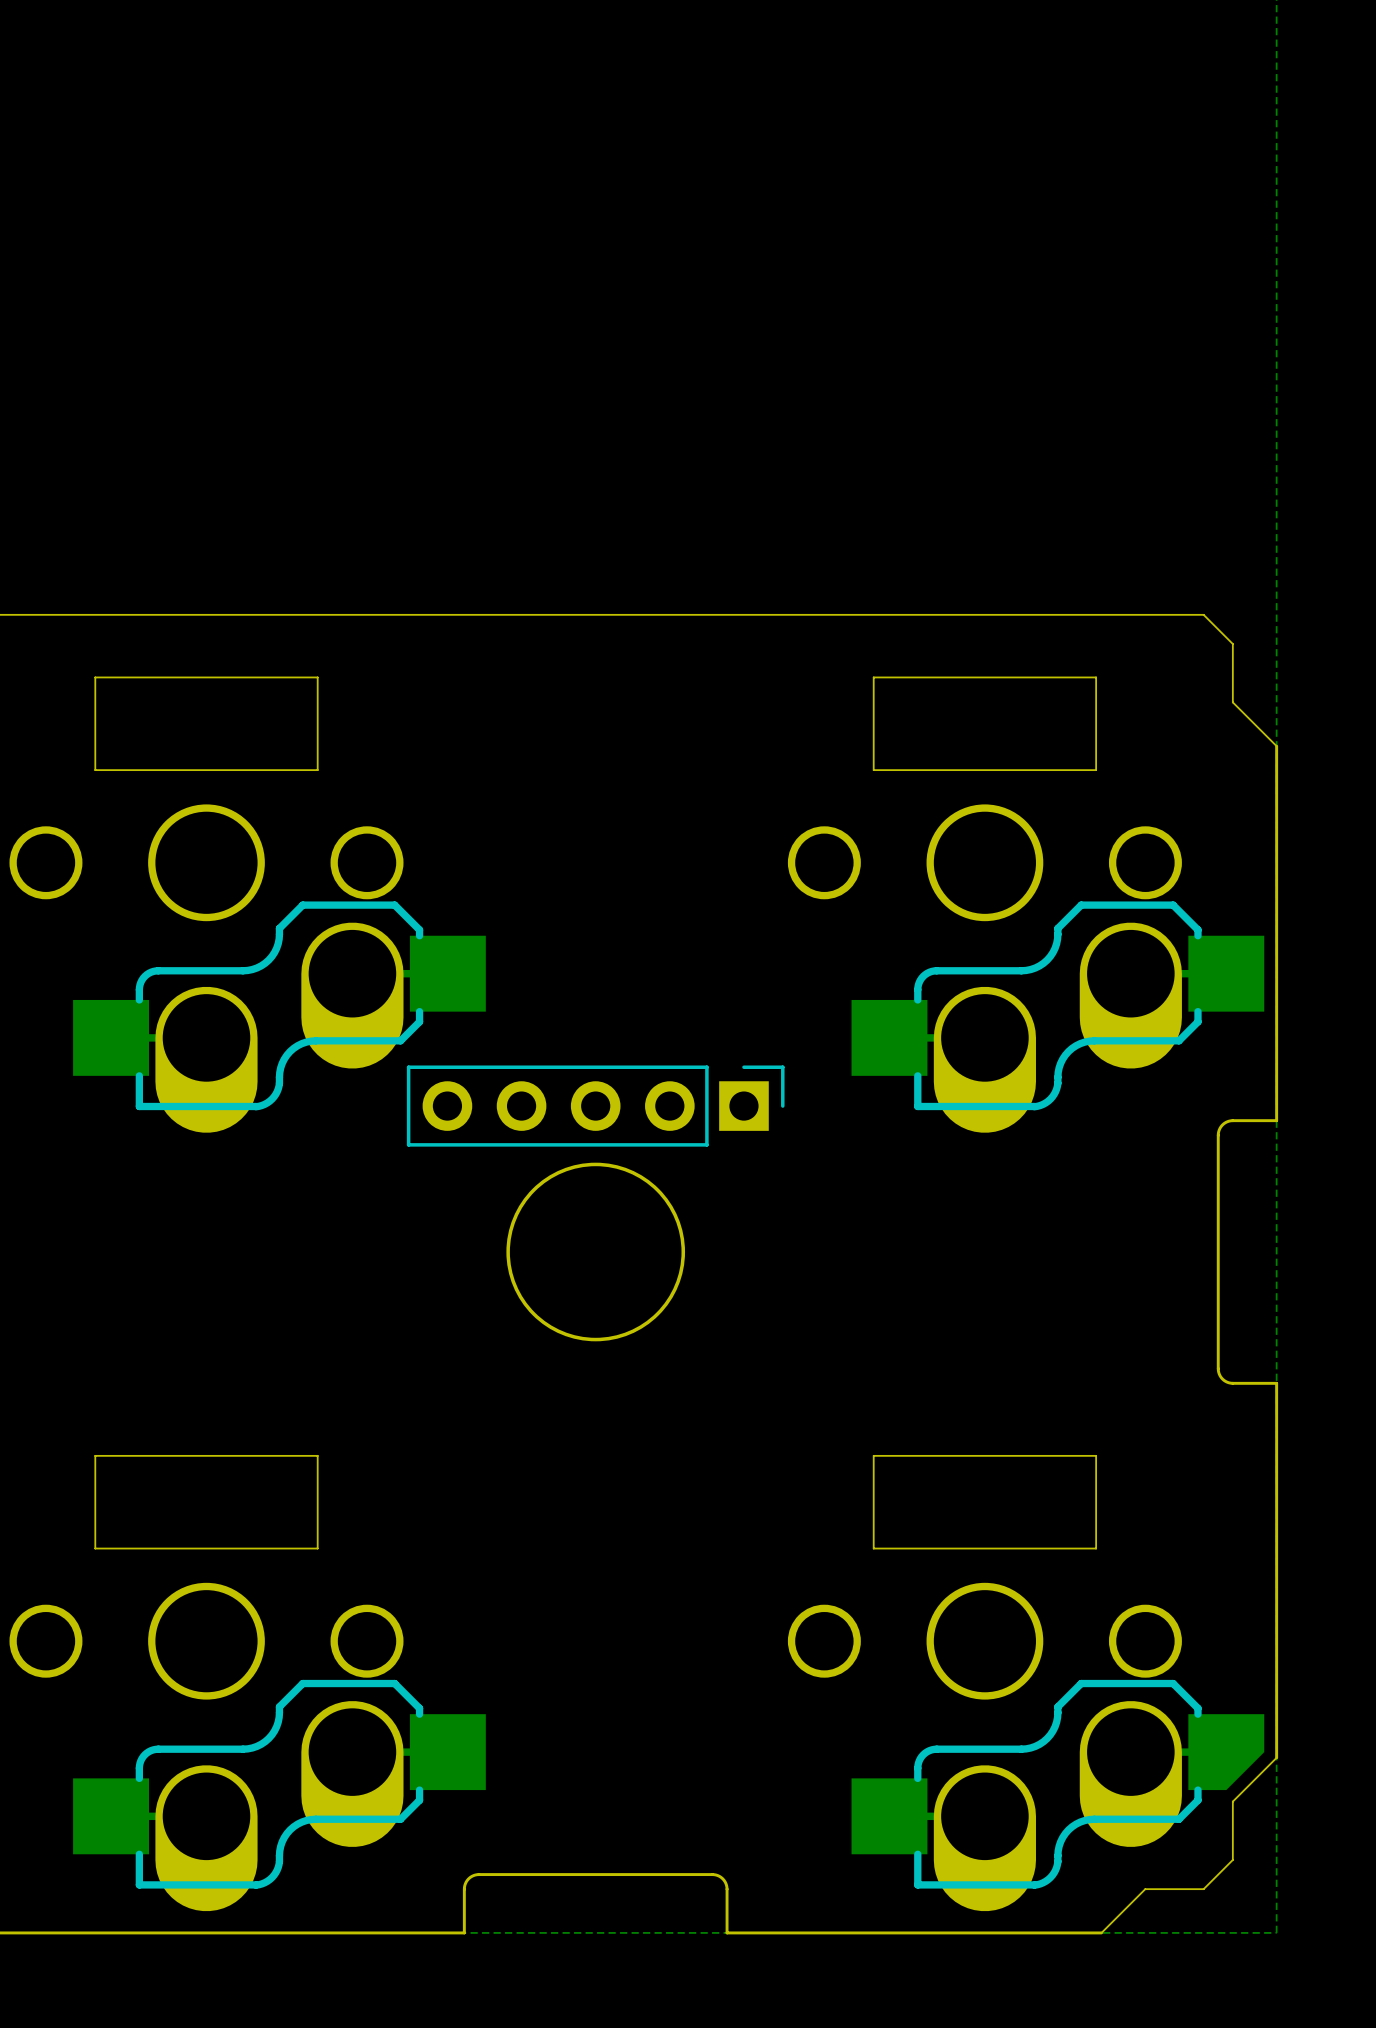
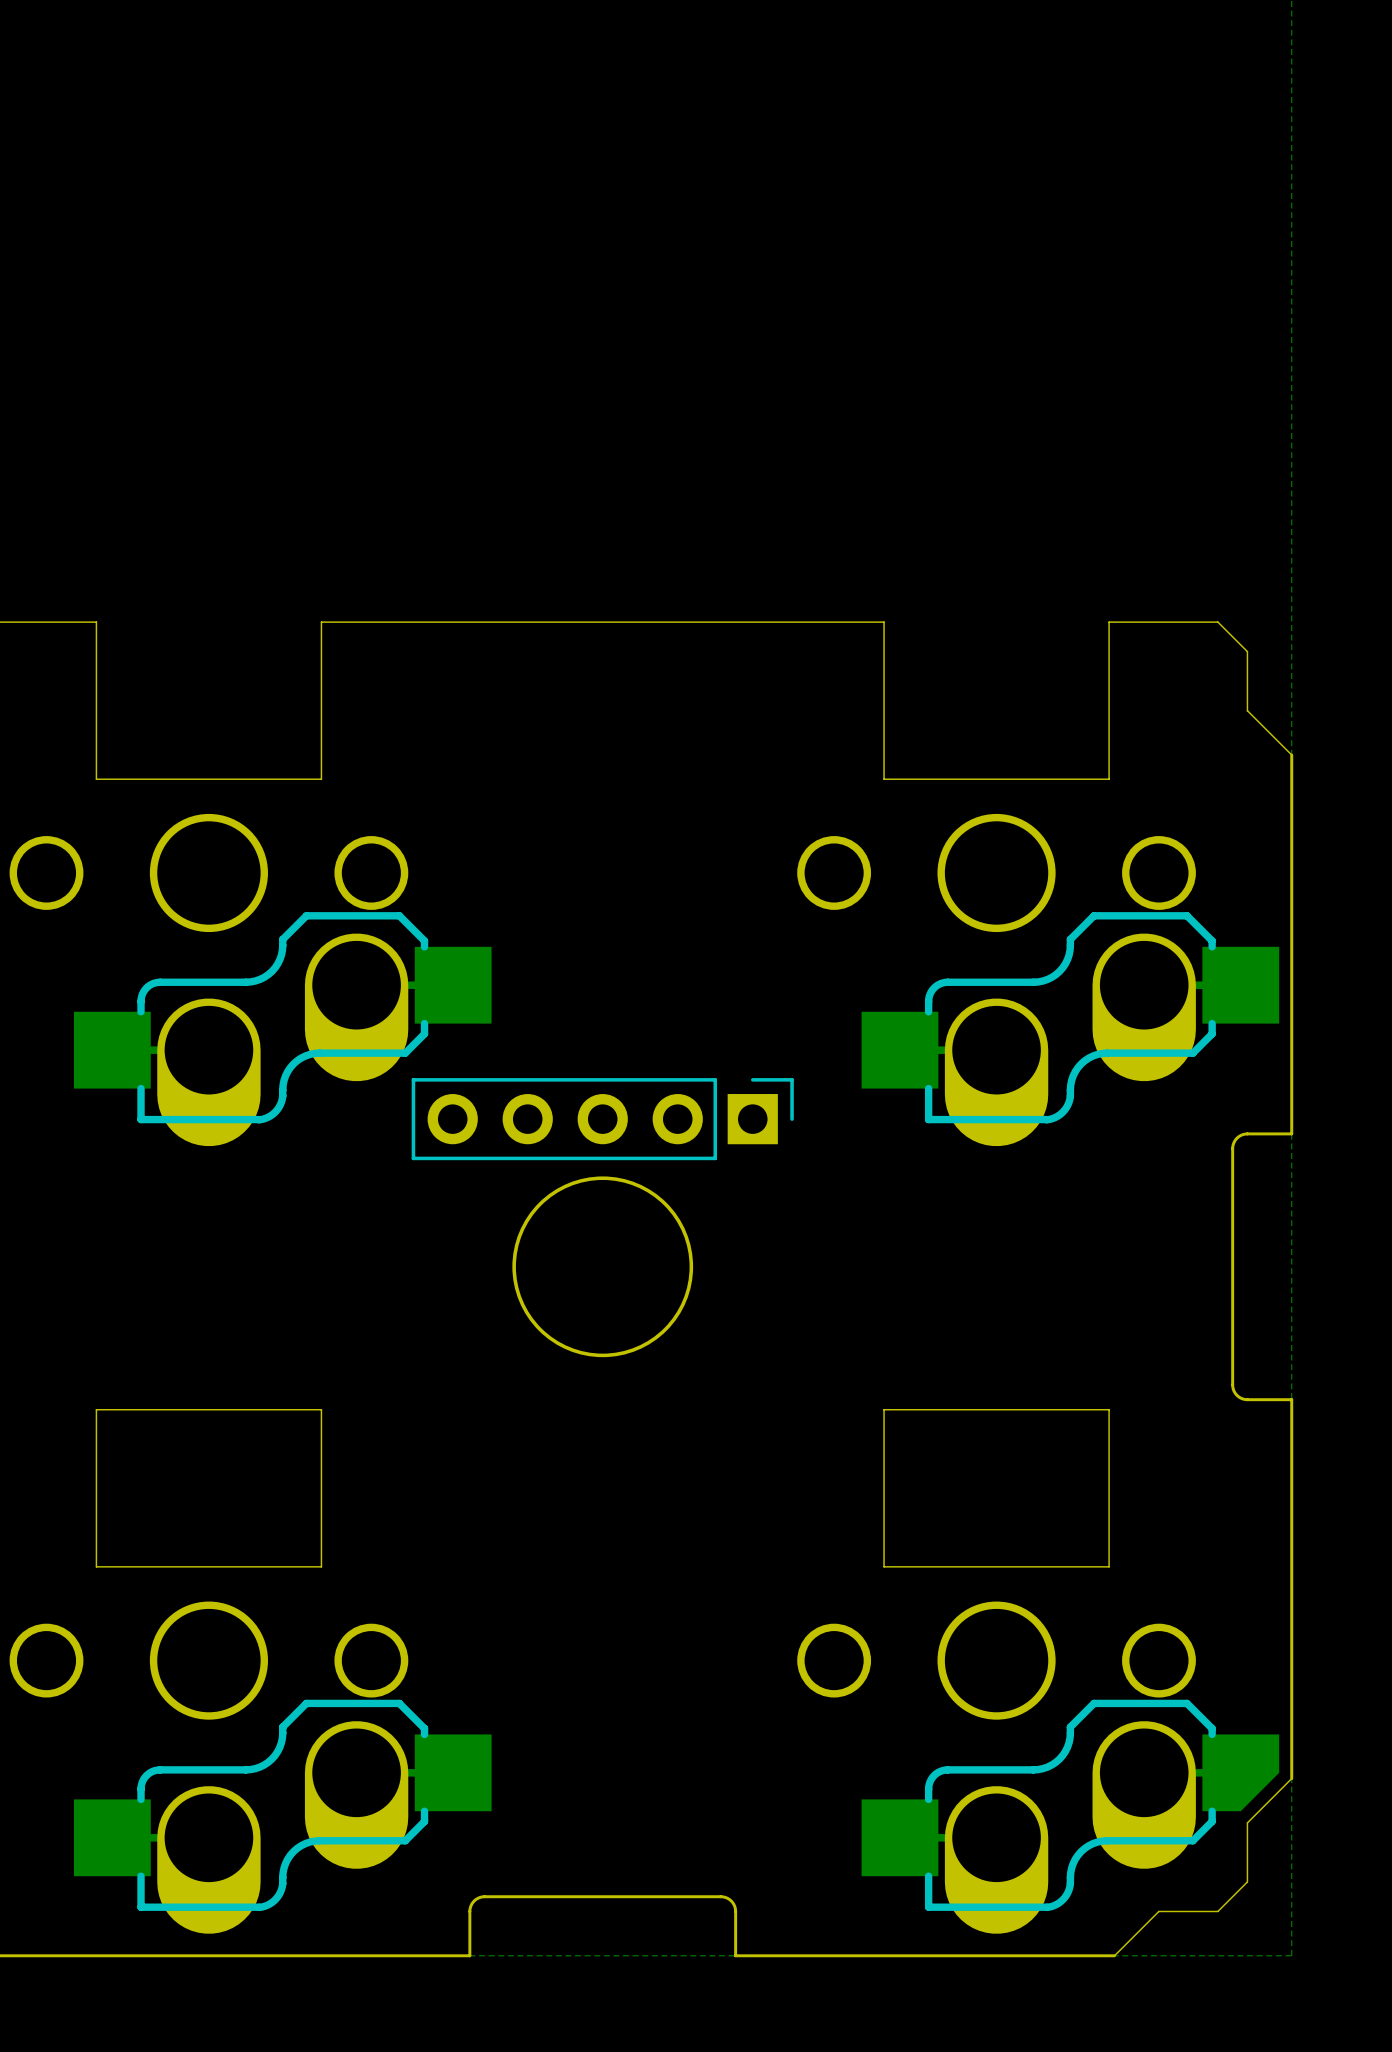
board edge: (317, 614) (95, 614) -> (321, 622) (321, 685)
board edge: (1096, 614) (873, 614) -> (1109, 622) (1109, 685)
board edge: (317, 677) (95, 677) -> (96, 622) (96, 685)
board edge: (1096, 677) (873, 677) -> (884, 622) (884, 685)
board edge: (317, 1455) (95, 1455) -> (321, 1473) (321, 1409) (96, 1409) (96, 1473)
board edge: (1096, 1455) (873, 1455) -> (1109, 1473) (1109, 1409) (884, 1409) (884, 1473)

